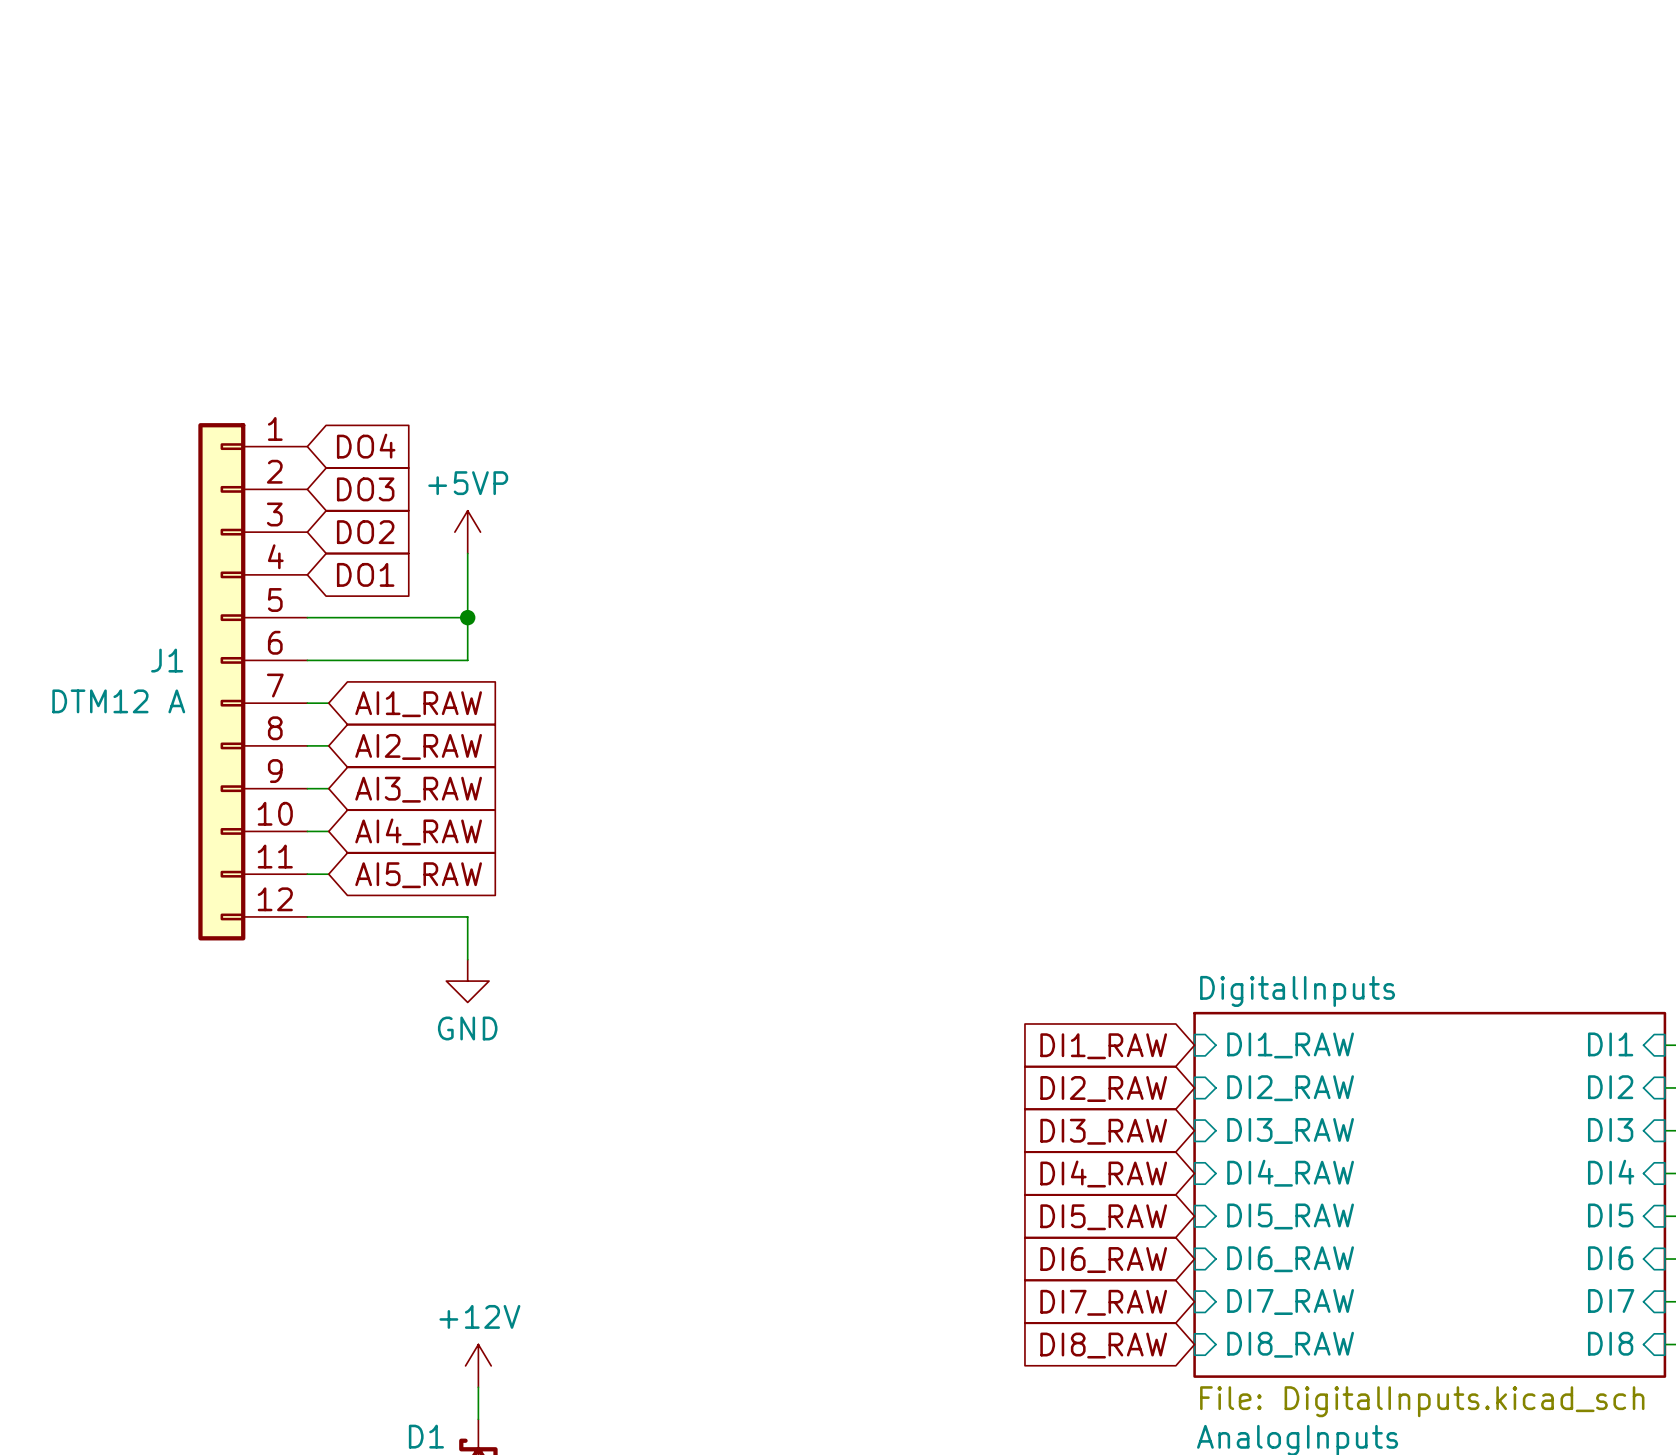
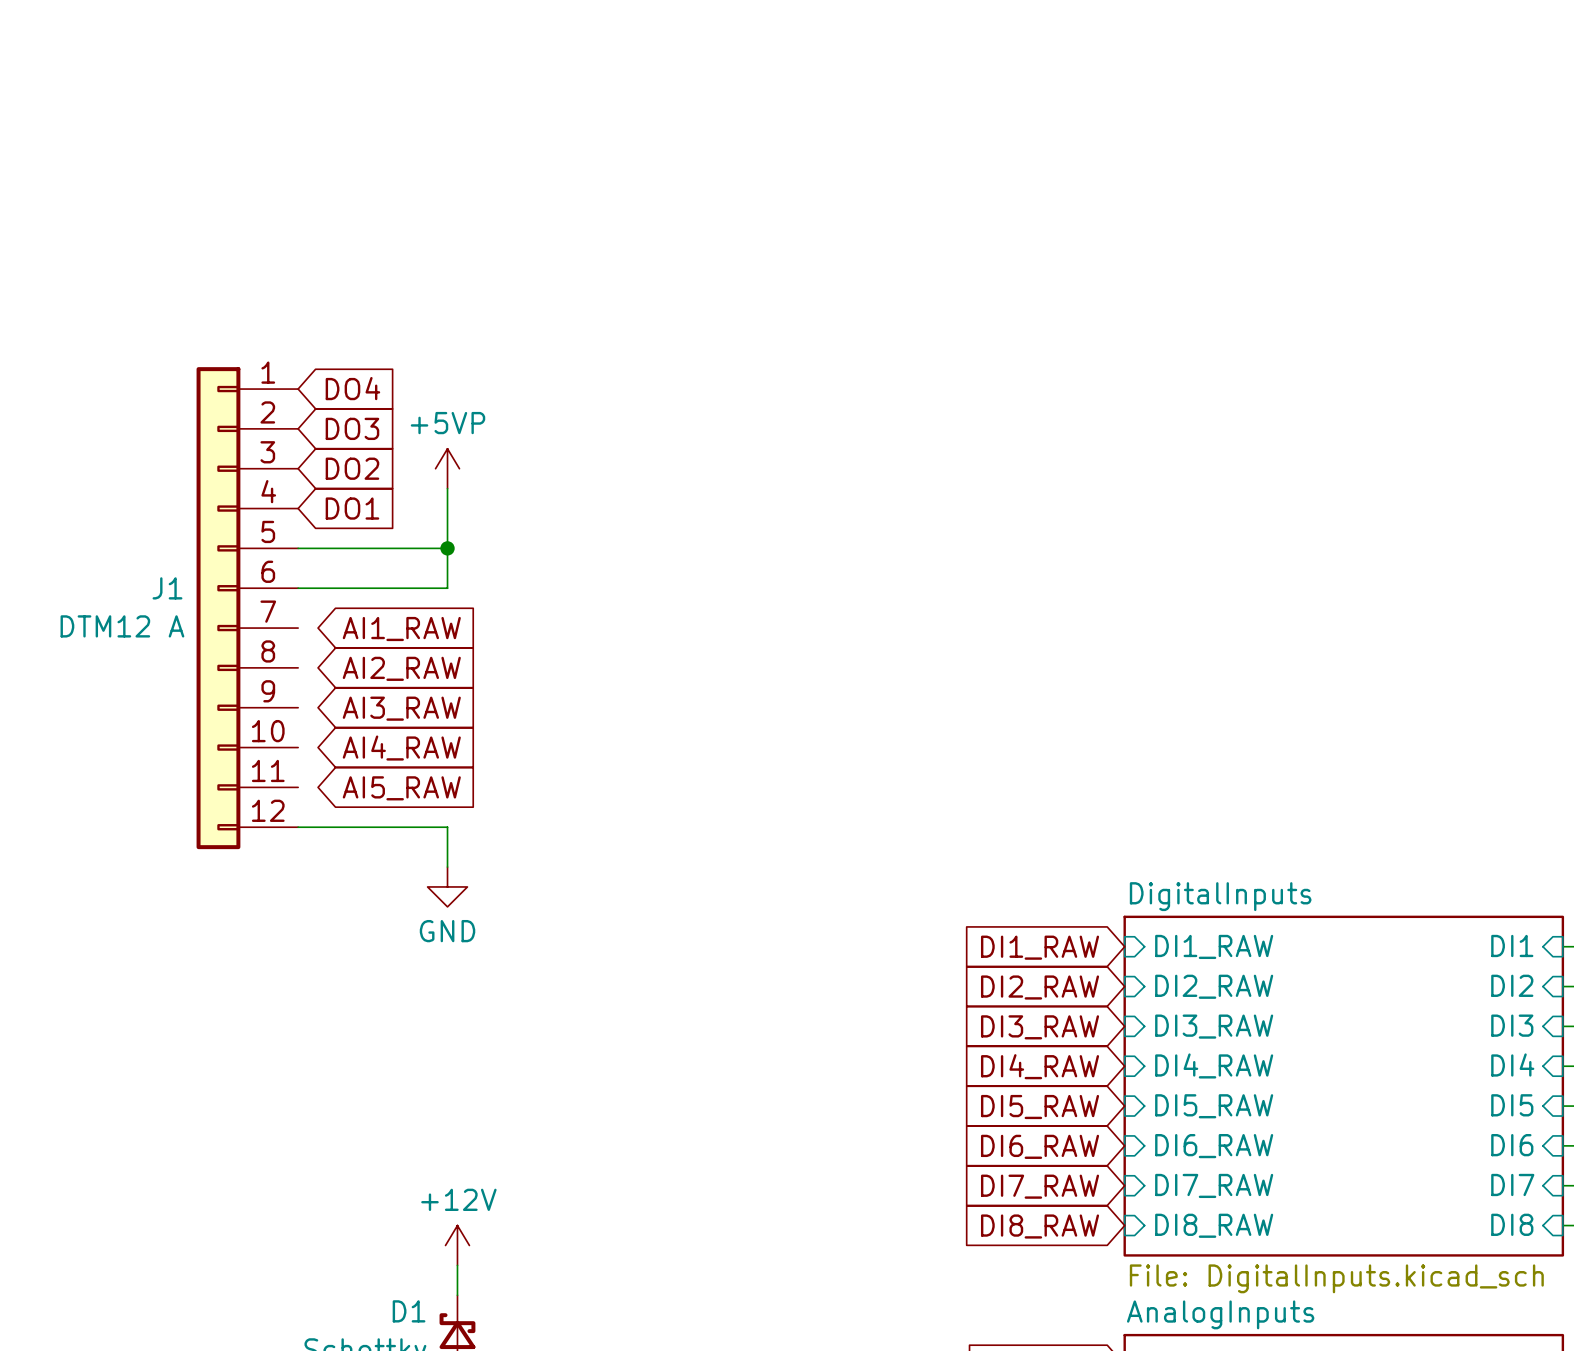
wire: (307, 703) (328, 703) -> none
wire: (307, 745) (328, 745) -> none
wire: (307, 788) (328, 788) -> none
wire: (307, 831) (328, 831) -> none
wire: (307, 874) (328, 874) -> none

